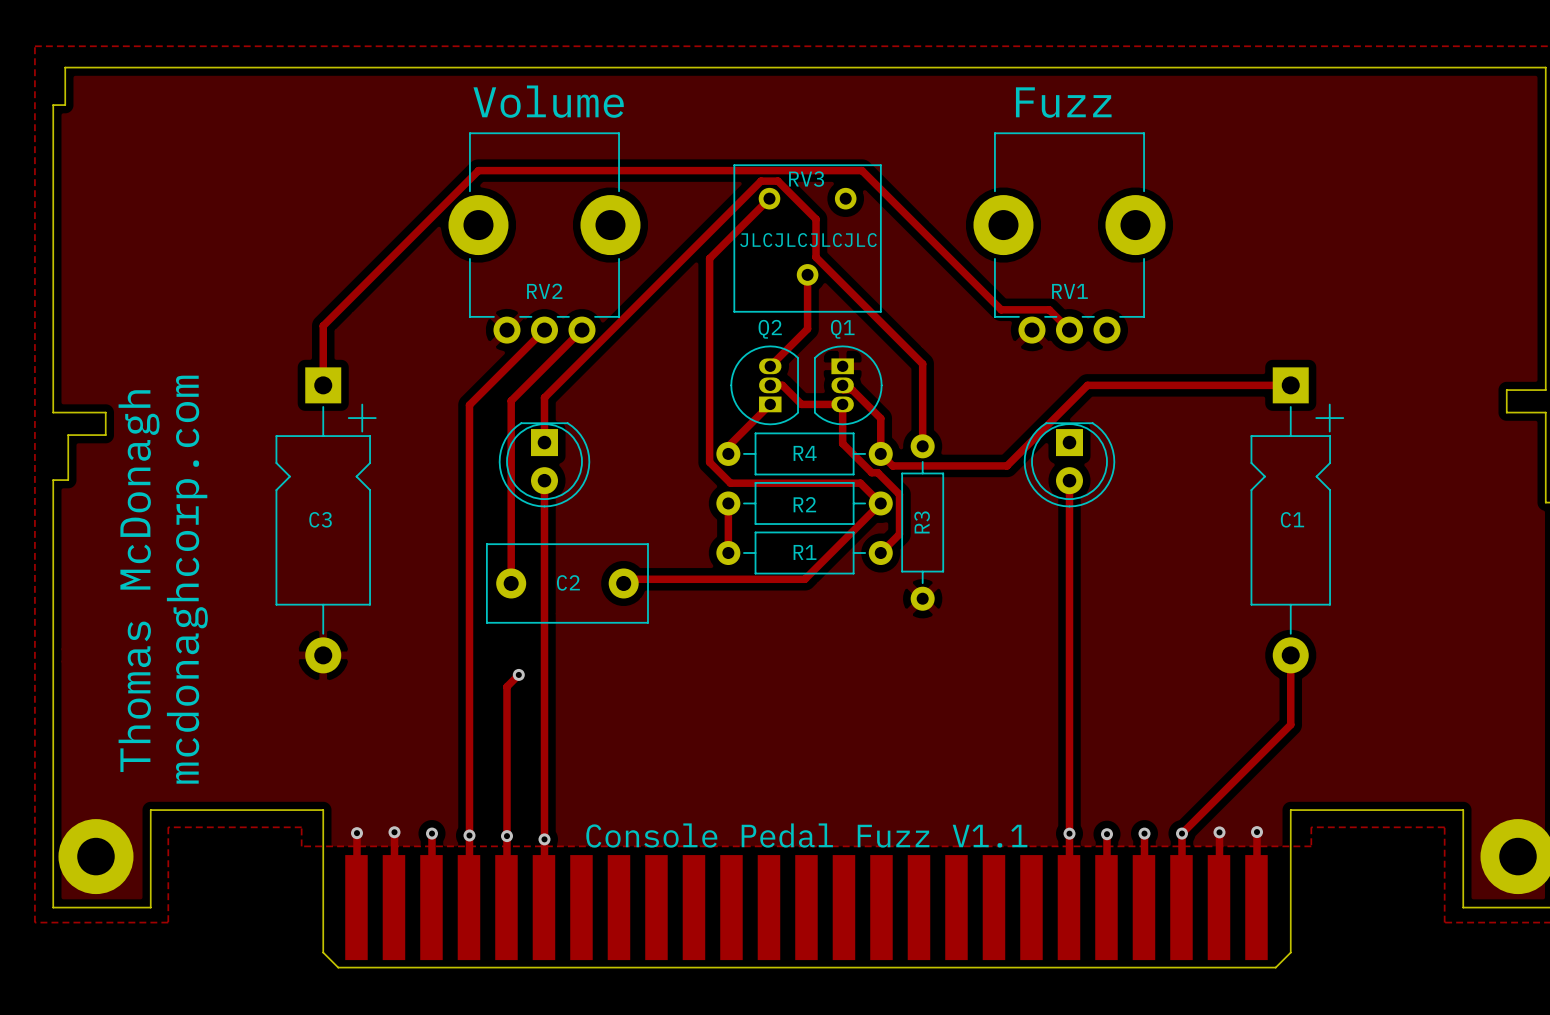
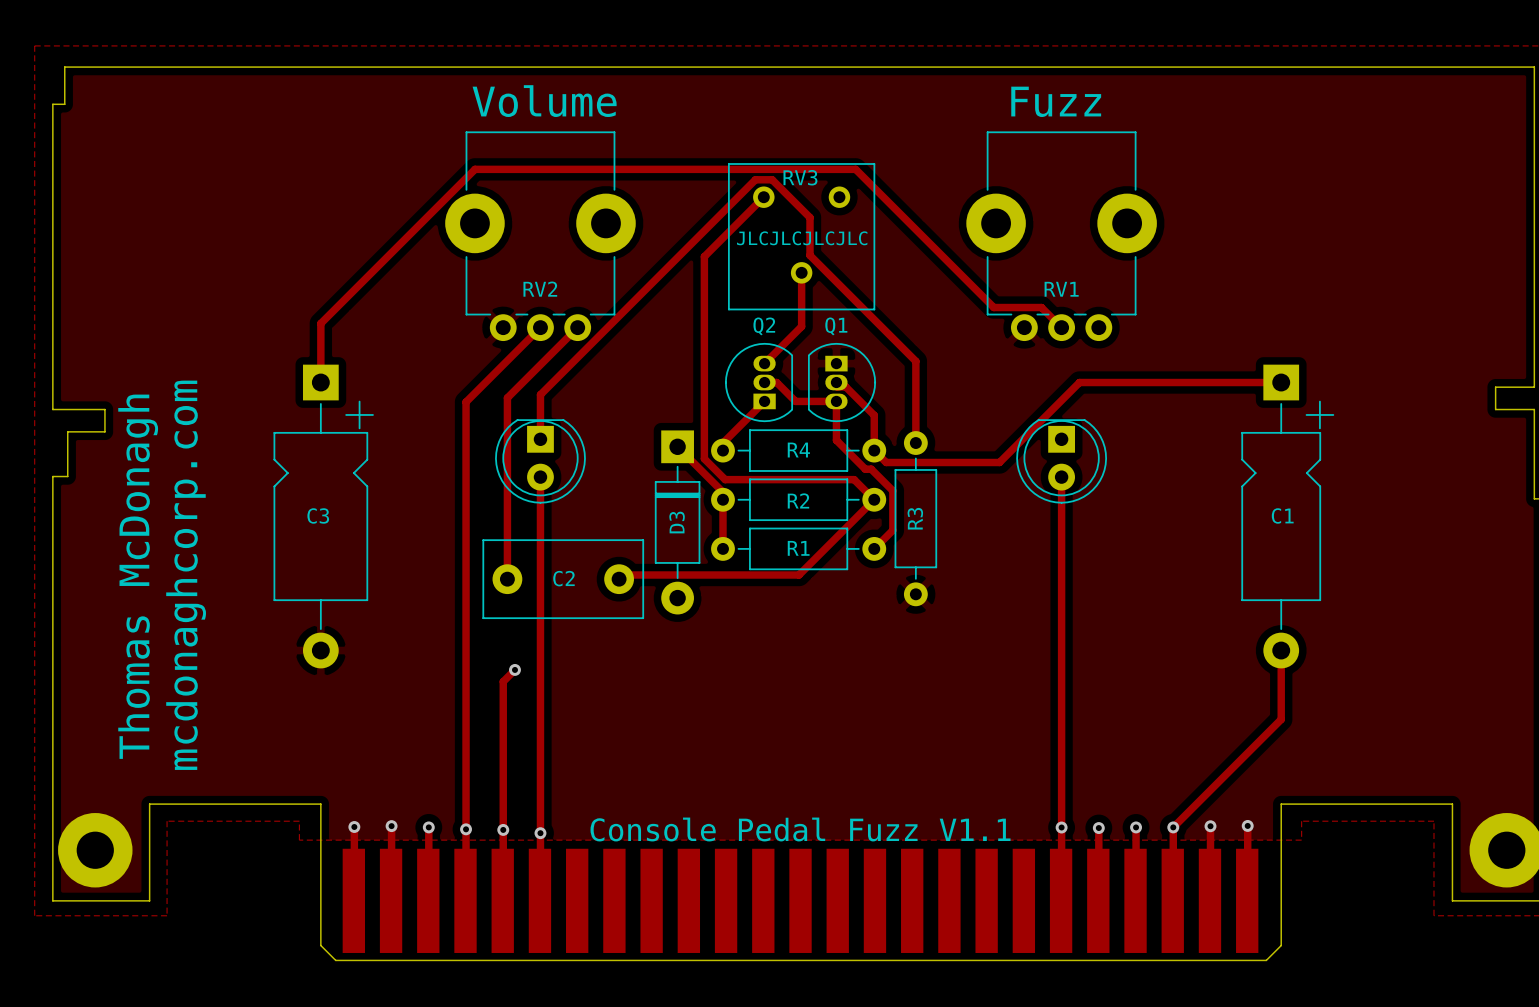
track: none -> (677, 446) (722, 492)
D3: none -> (677, 522)

